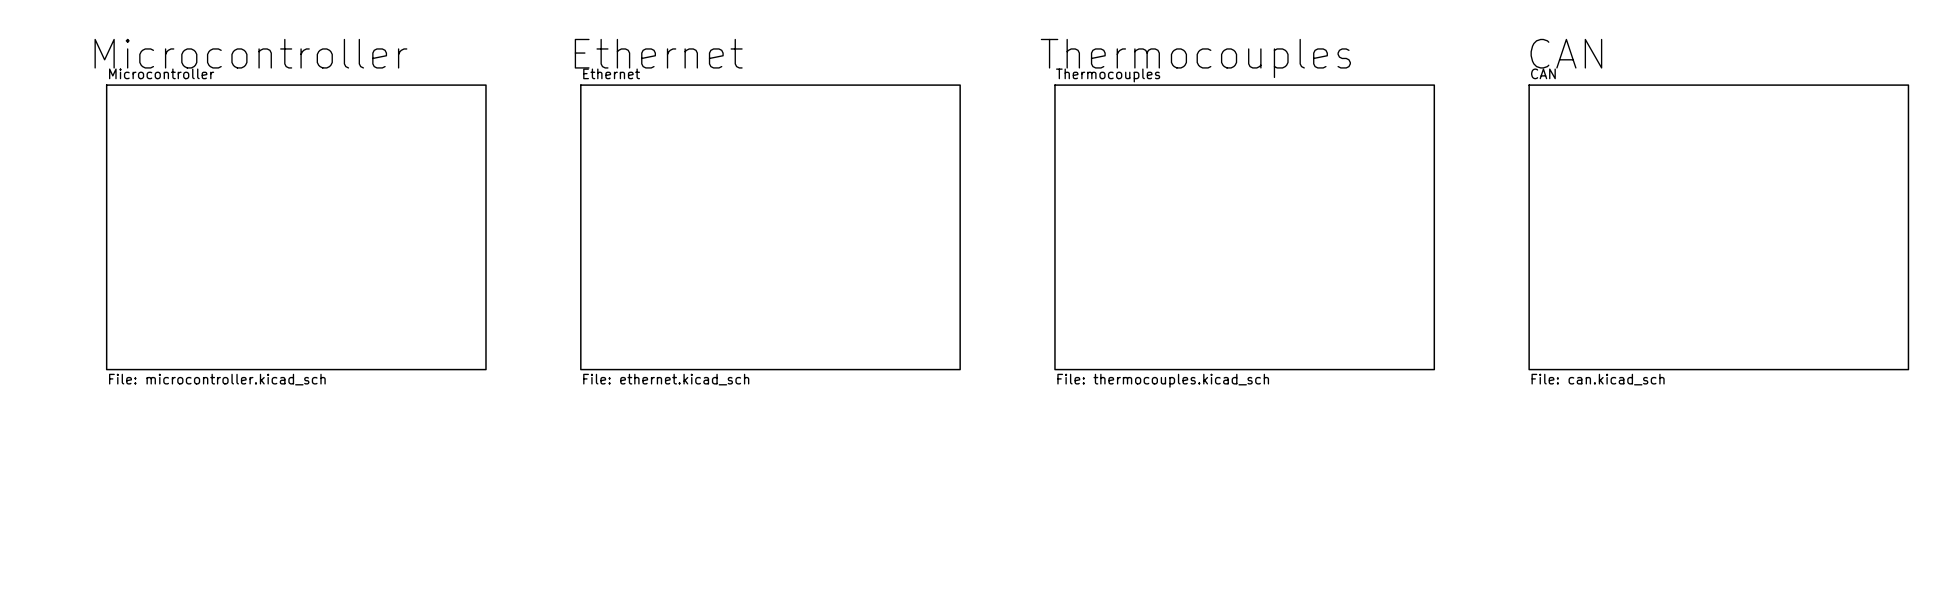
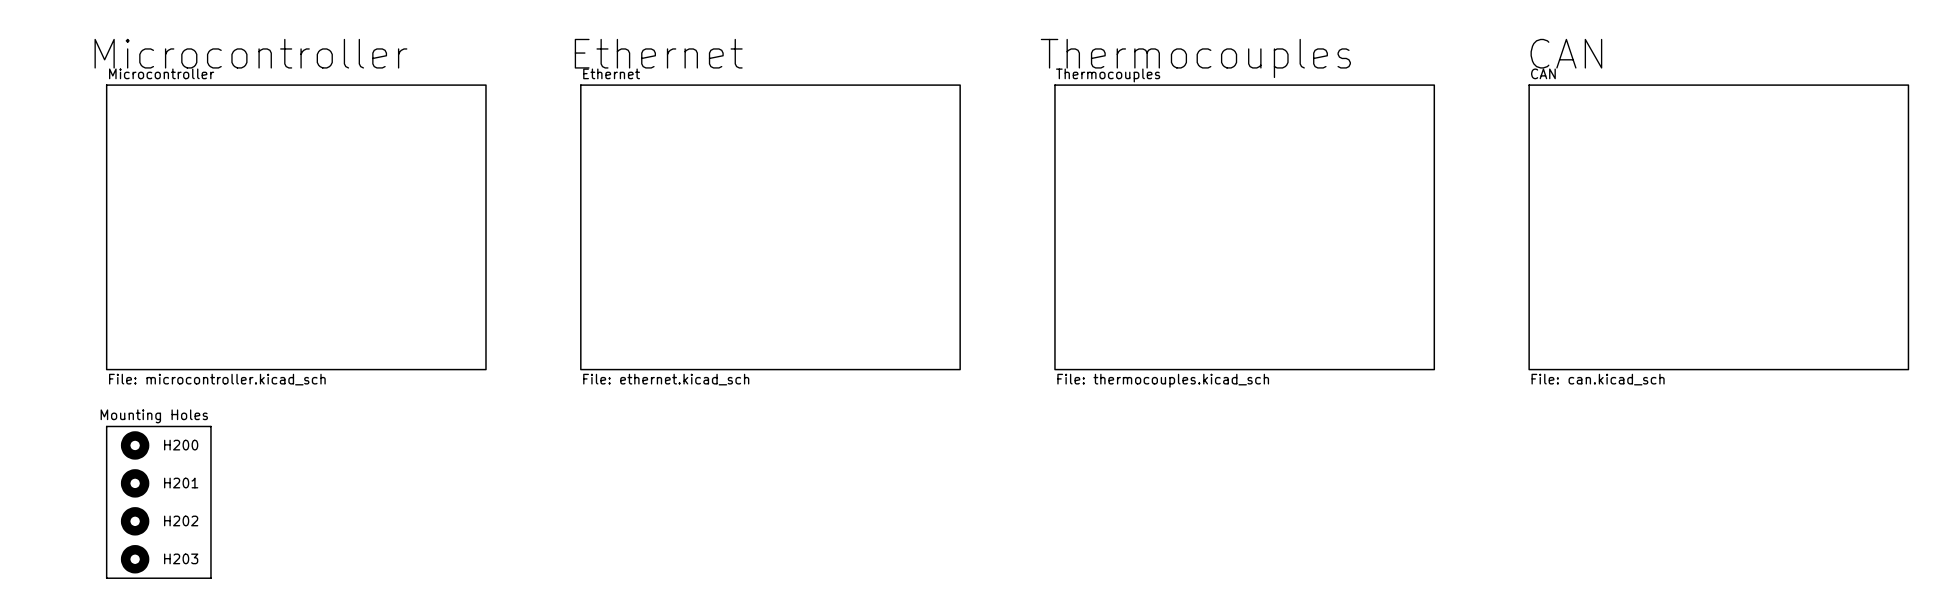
text: none -> Mounting Holes (154, 416)
line: none -> (106, 426) (210, 426) (210, 578) (106, 578) (106, 426)
H200: none -> (135, 445)
H201: none -> (135, 483)
H202: none -> (135, 521)
H203: none -> (135, 559)

